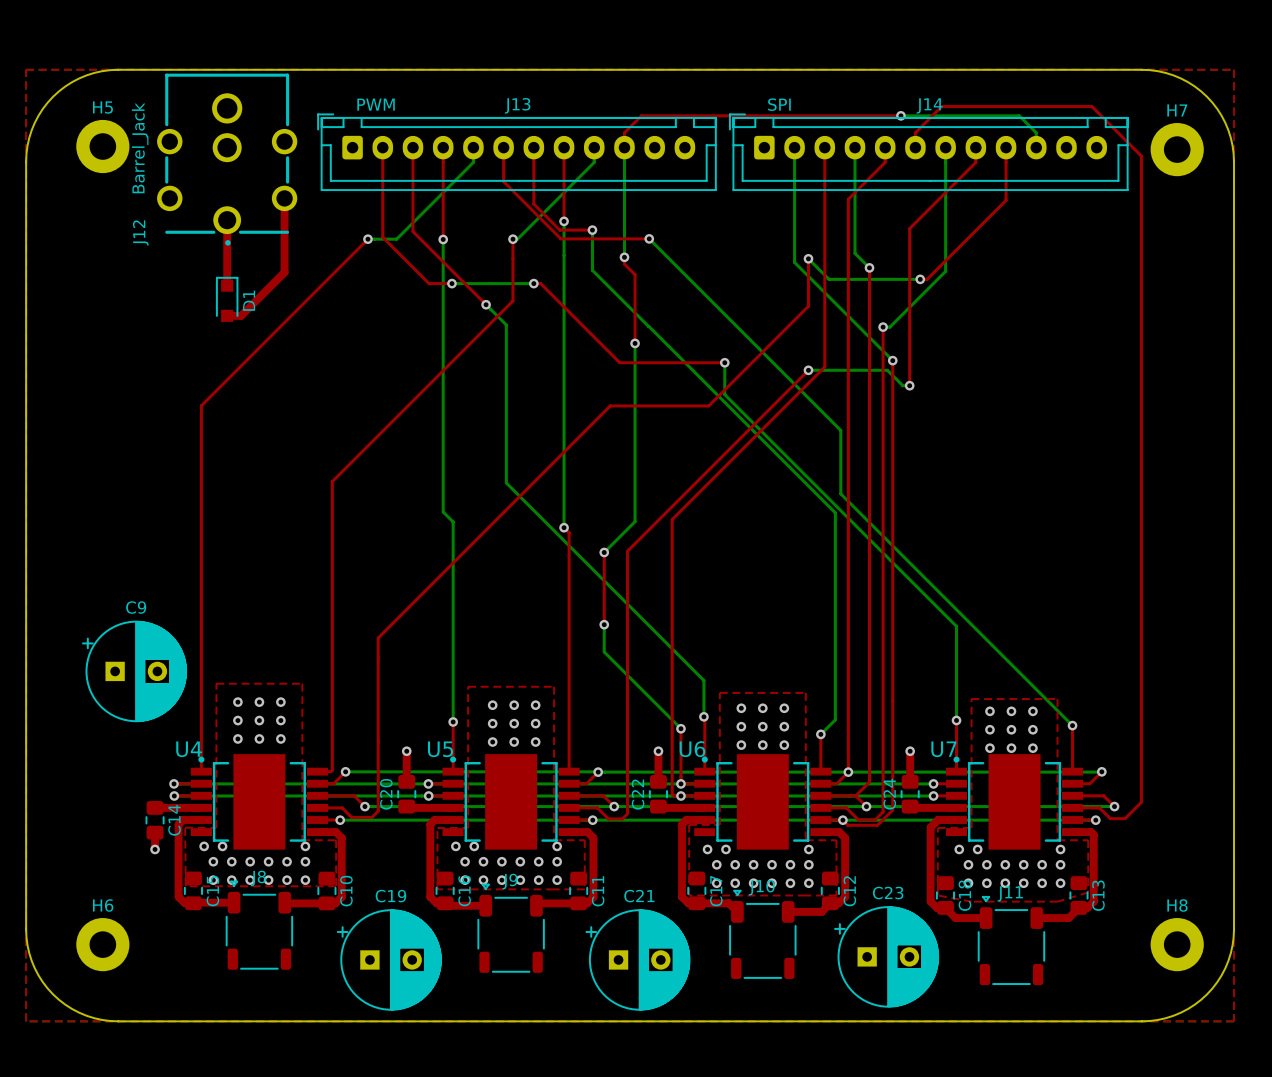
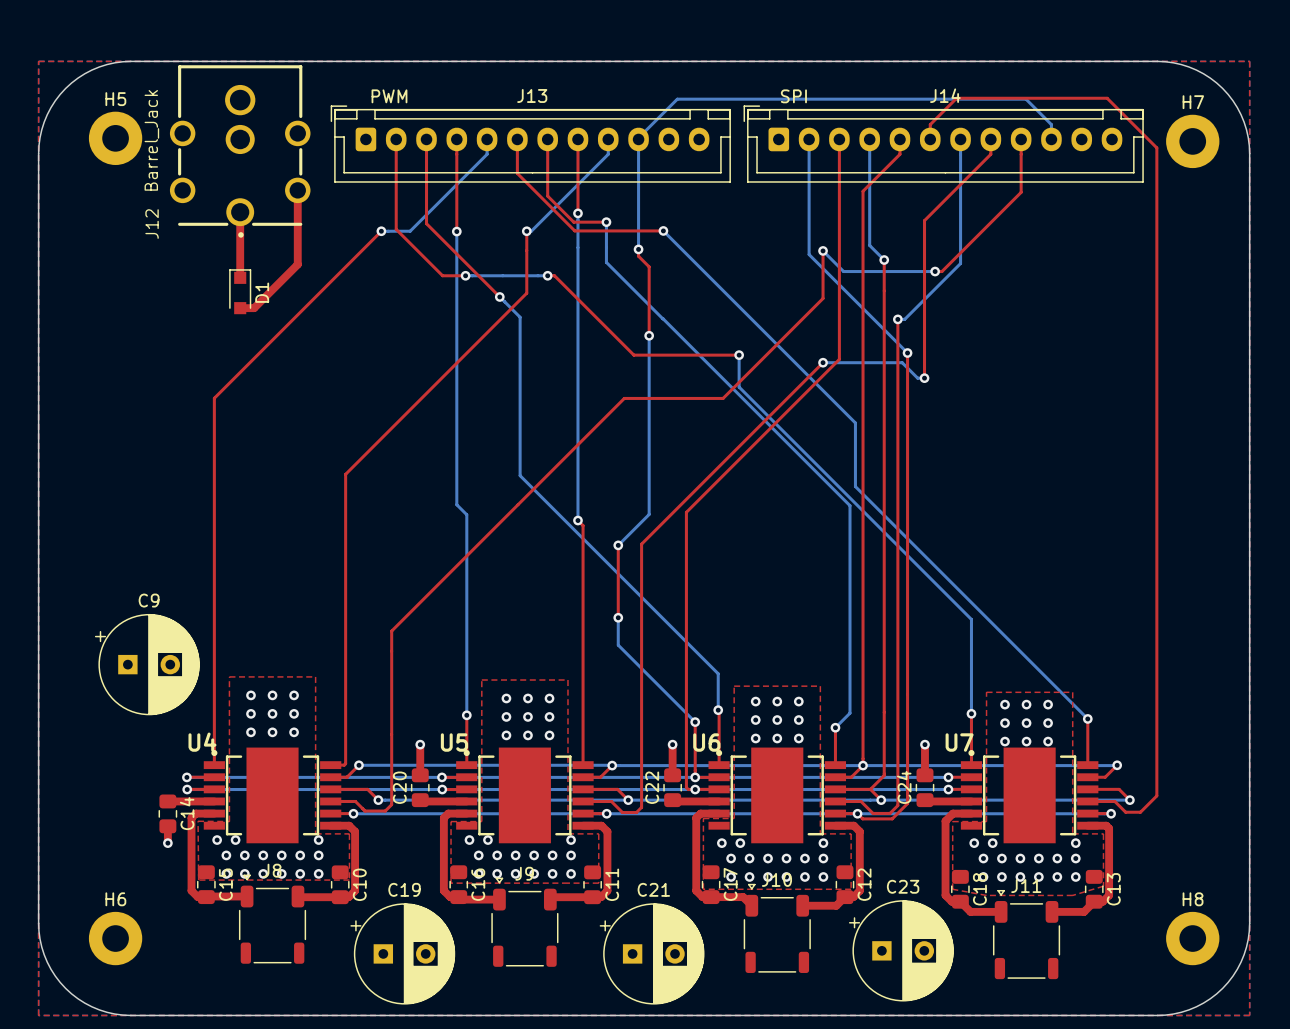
top track: (900, 115) (641, 115) (624, 132) (624, 147) -> none
bottom track: (900, 115) (1019, 115) -> (638, 139) (677, 99) (1025, 99) (1034, 107)
via: (900, 115) -> none

